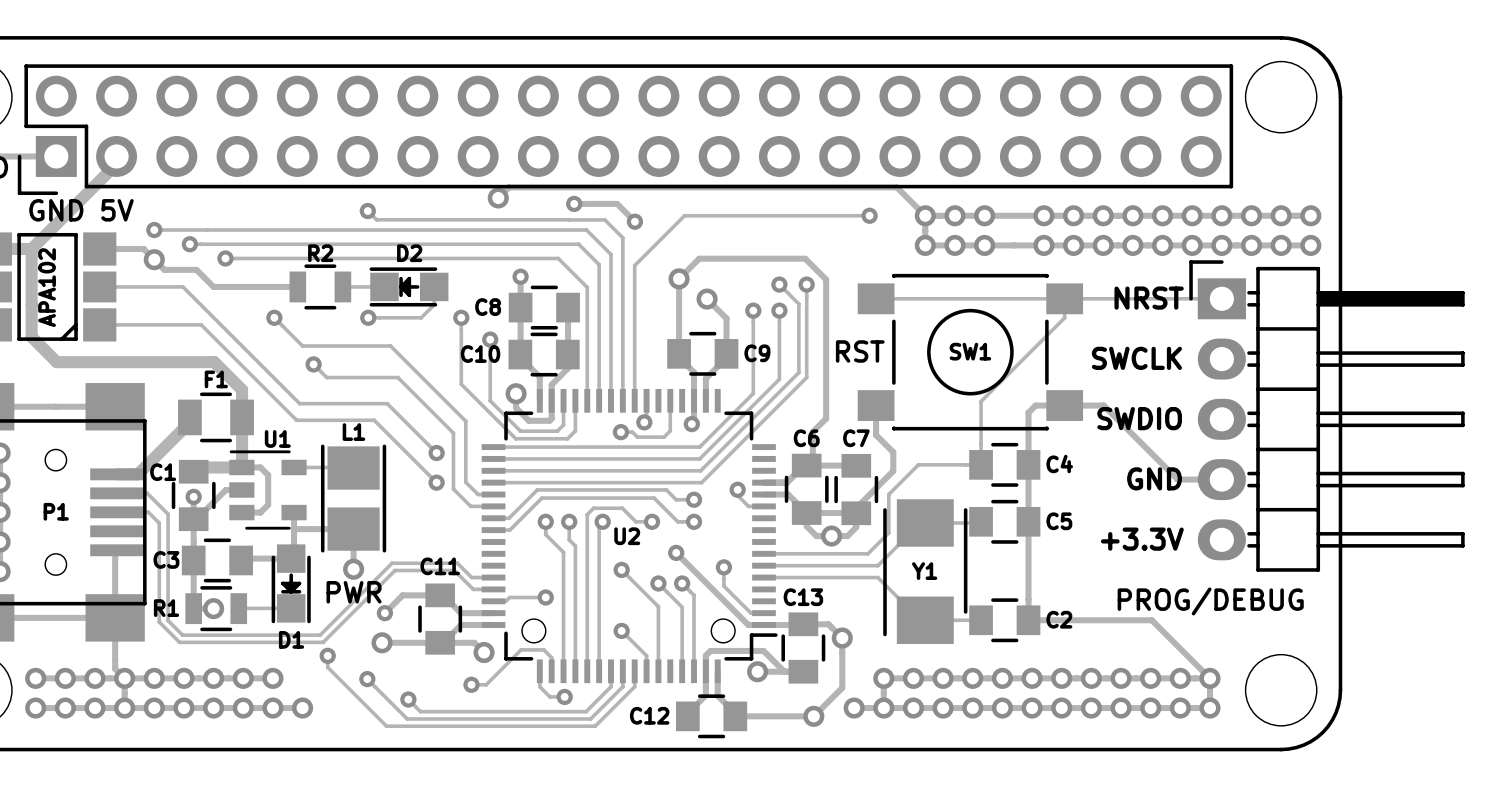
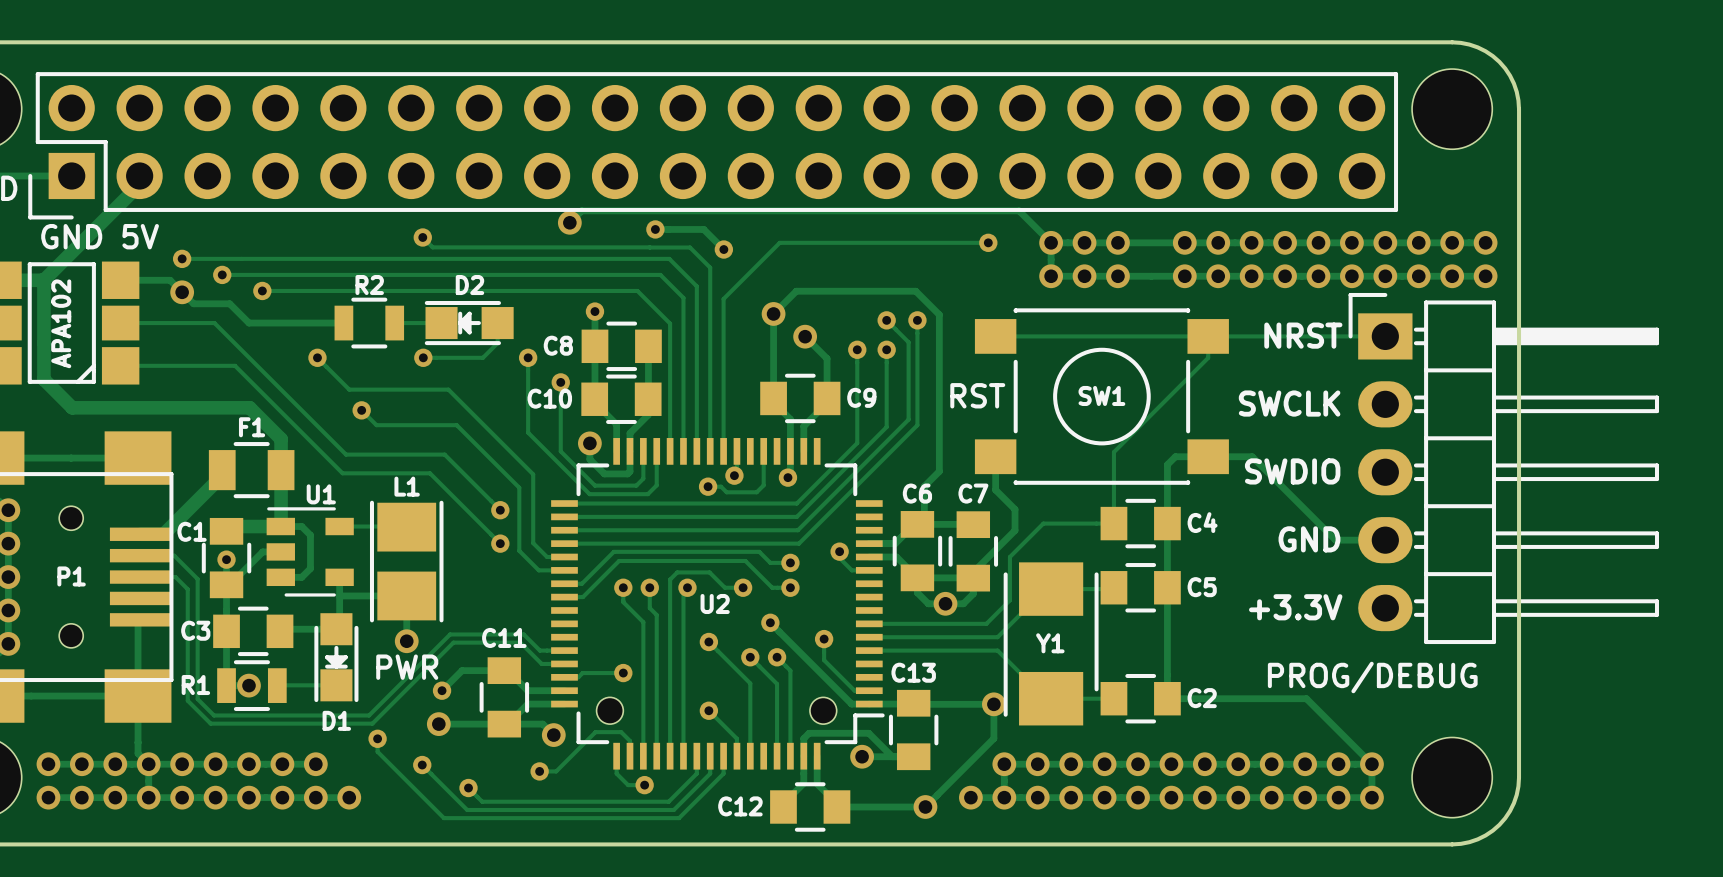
track: (803, 624) (828, 624) (842, 638) (842, 687) -> (913, 703) (993, 704) (993, 738) (957, 774)
via position: (842, 638) -> (993, 704)

